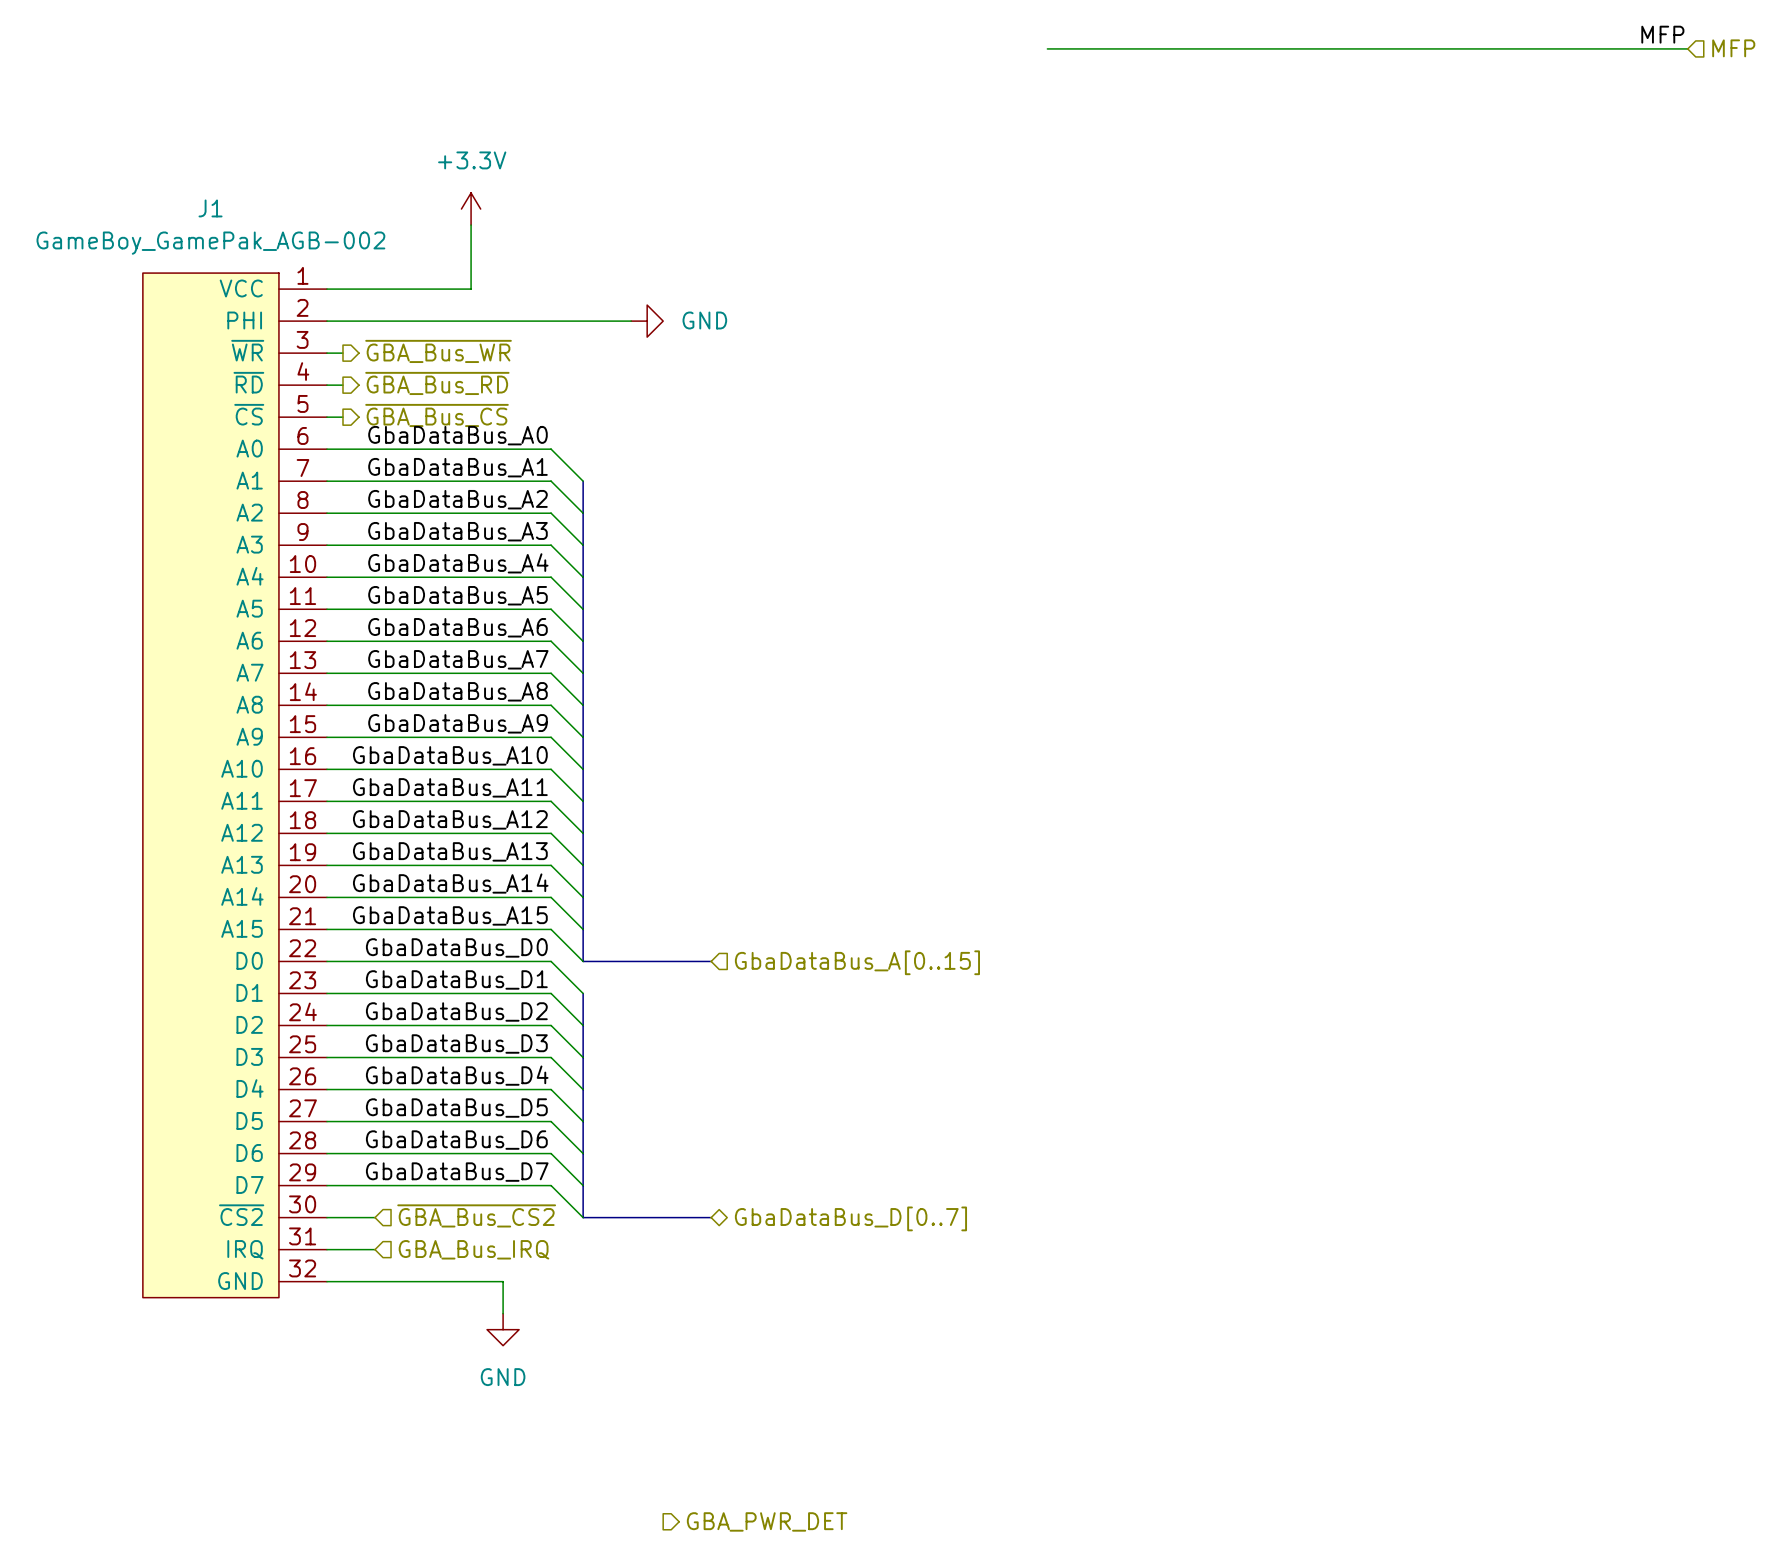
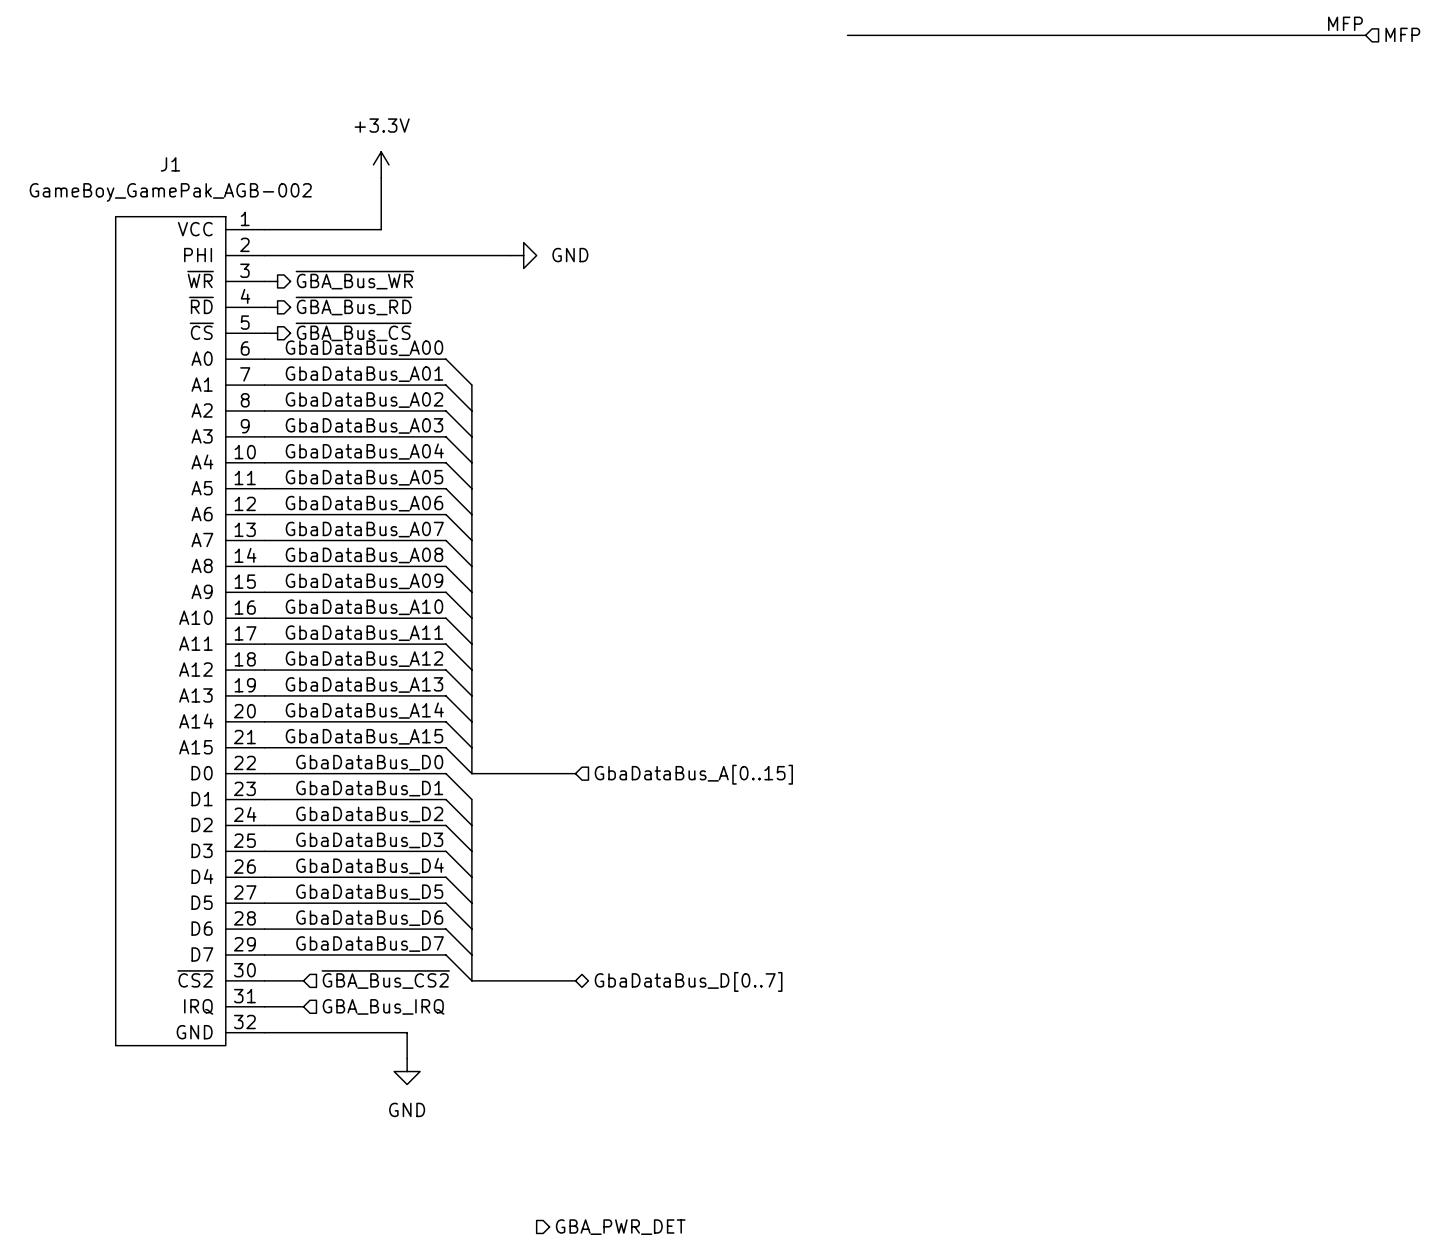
label: GbaDataBus_A0 (457, 435) -> GbaDataBus_A00 (364, 348)
label: GbaDataBus_A1 (457, 467) -> GbaDataBus_A01 (364, 374)
label: GbaDataBus_A2 (457, 499) -> GbaDataBus_A02 (364, 400)
label: GbaDataBus_A3 (457, 531) -> GbaDataBus_A03 (364, 425)
label: GbaDataBus_A4 (458, 563) -> GbaDataBus_A04 (364, 451)
label: GbaDataBus_A5 (457, 595) -> GbaDataBus_A05 (364, 477)
label: GbaDataBus_A6 (457, 627) -> GbaDataBus_A06 (364, 503)
label: GbaDataBus_A7 (458, 659) -> GbaDataBus_A07 (364, 529)
label: GbaDataBus_A8 (457, 691) -> GbaDataBus_A08 (364, 555)
label: GbaDataBus_A9 (457, 723) -> GbaDataBus_A09 (364, 581)

